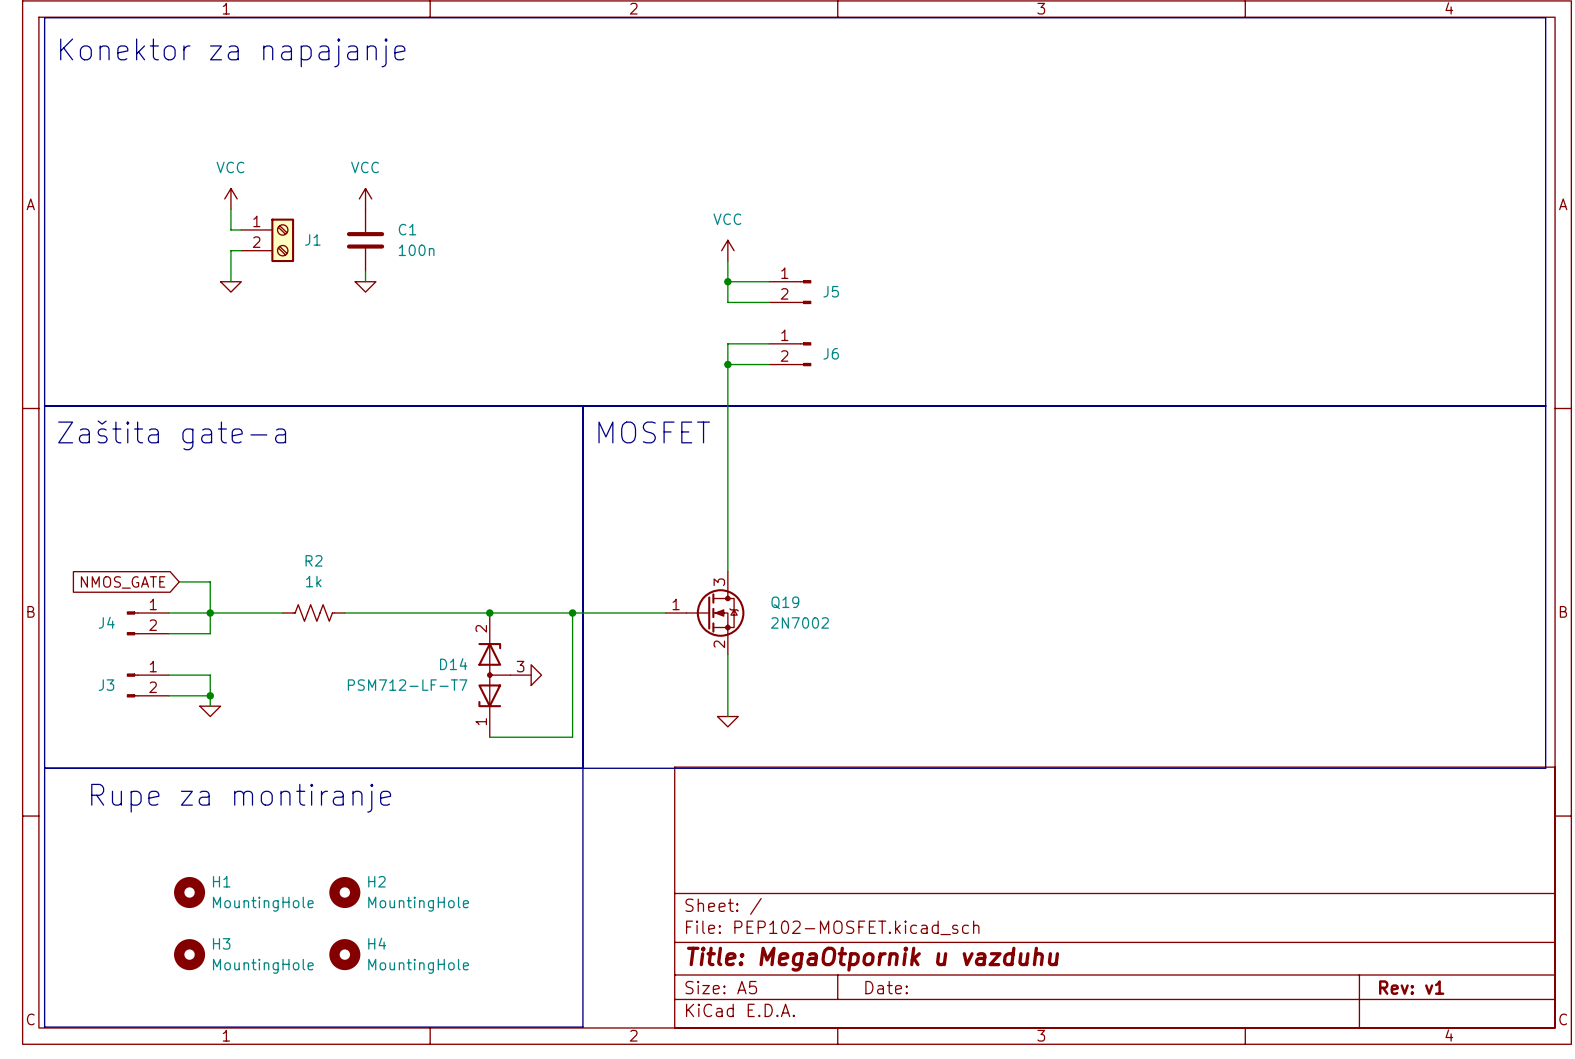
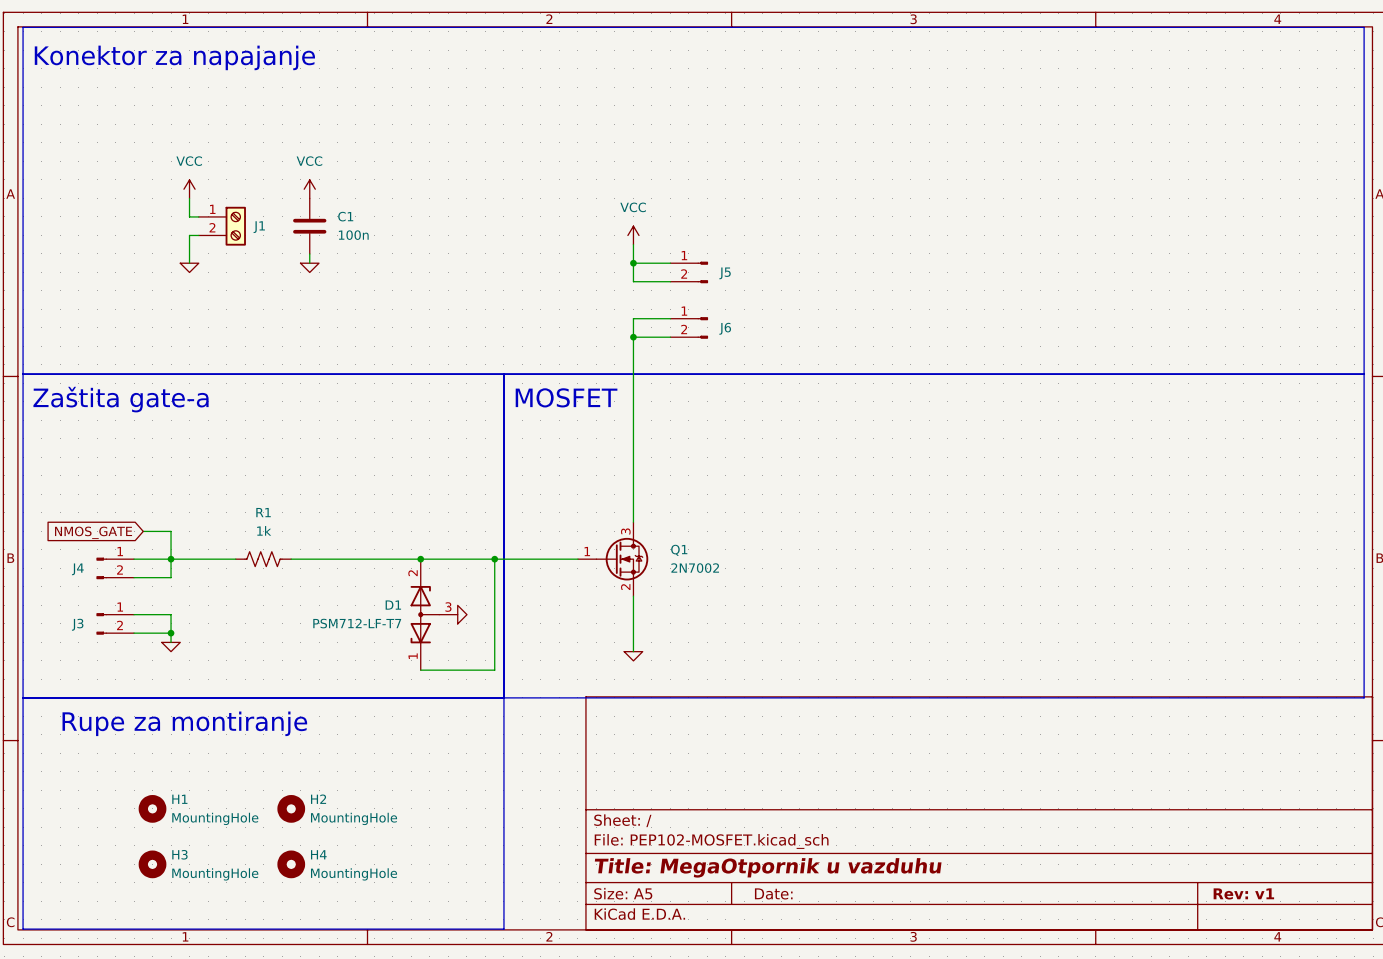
R2 name: R2 (314, 560) -> R1 (263, 512)
Q19 name: Q19 (785, 602) -> Q1 (679, 550)
D14 name: D14 (453, 664) -> D1 (393, 605)

